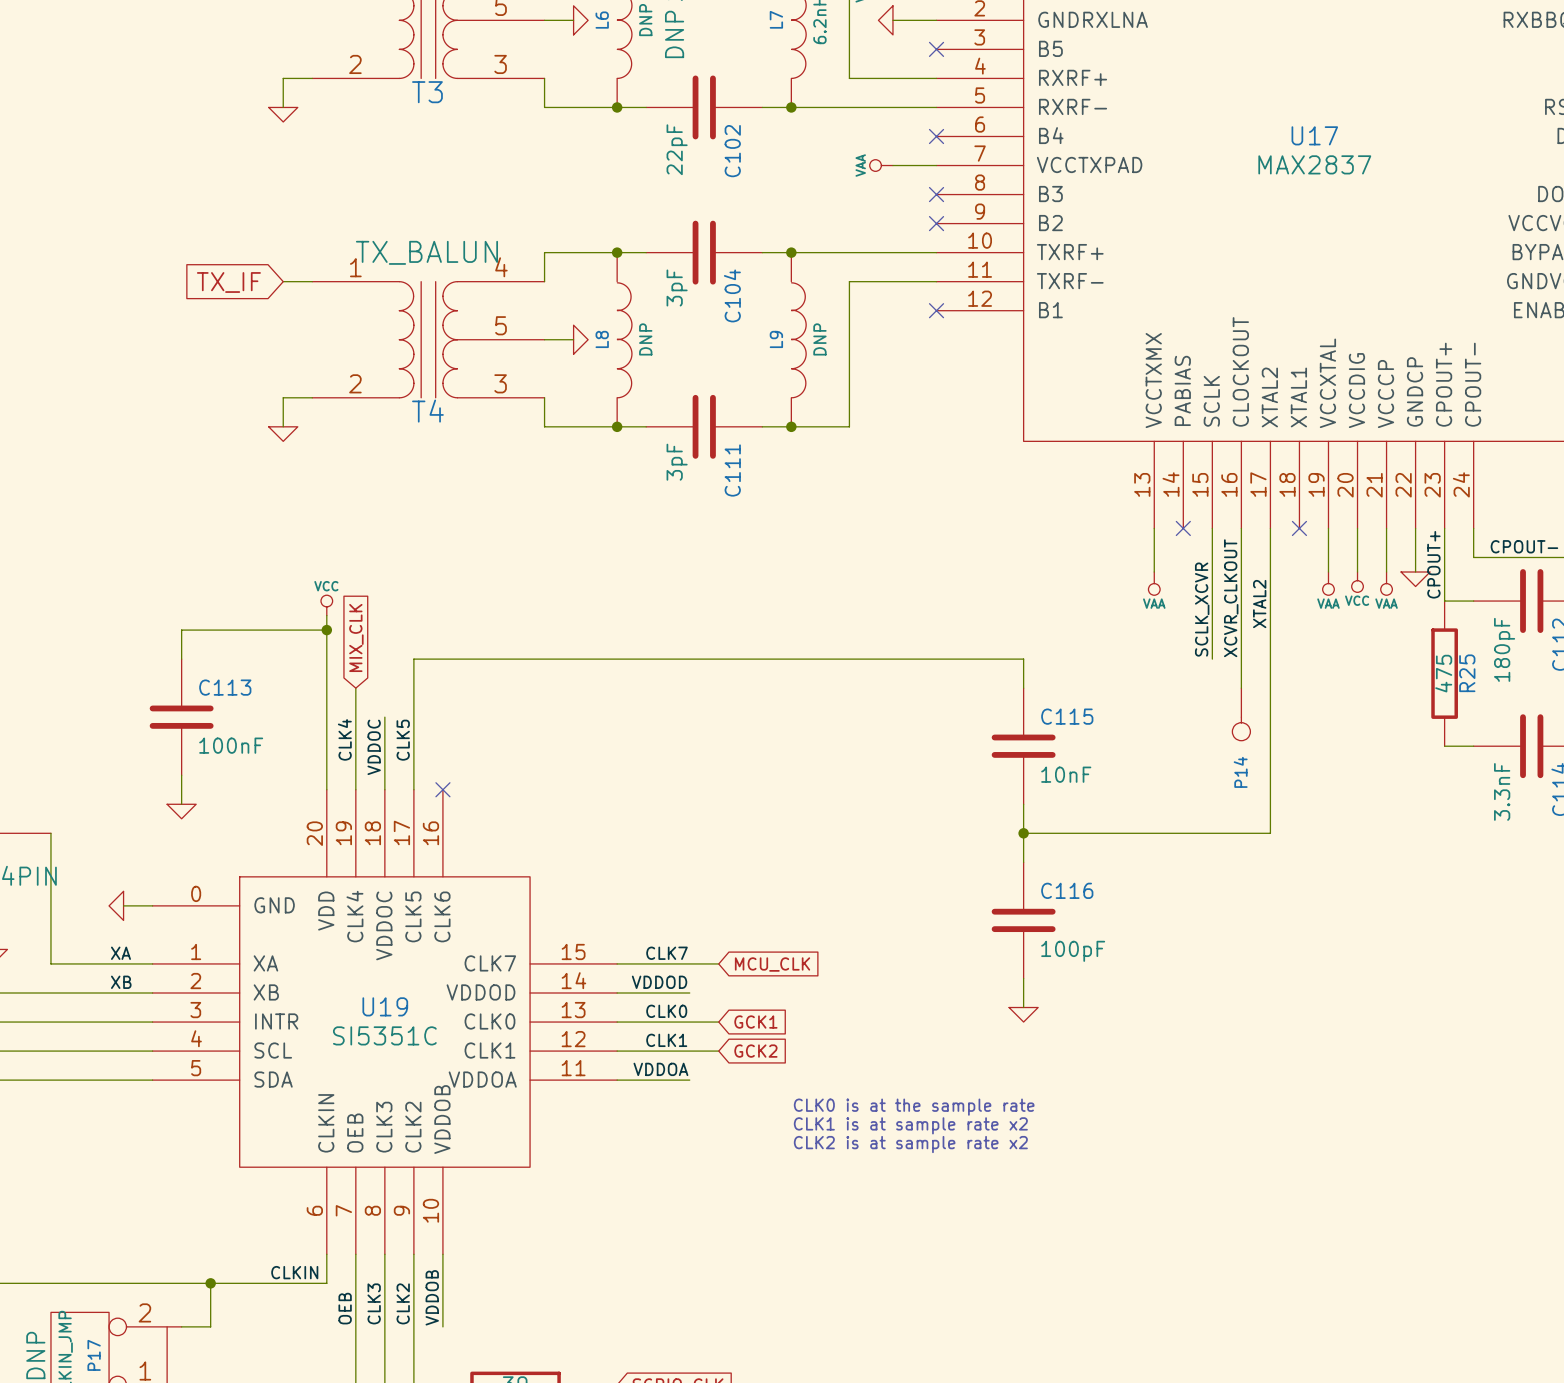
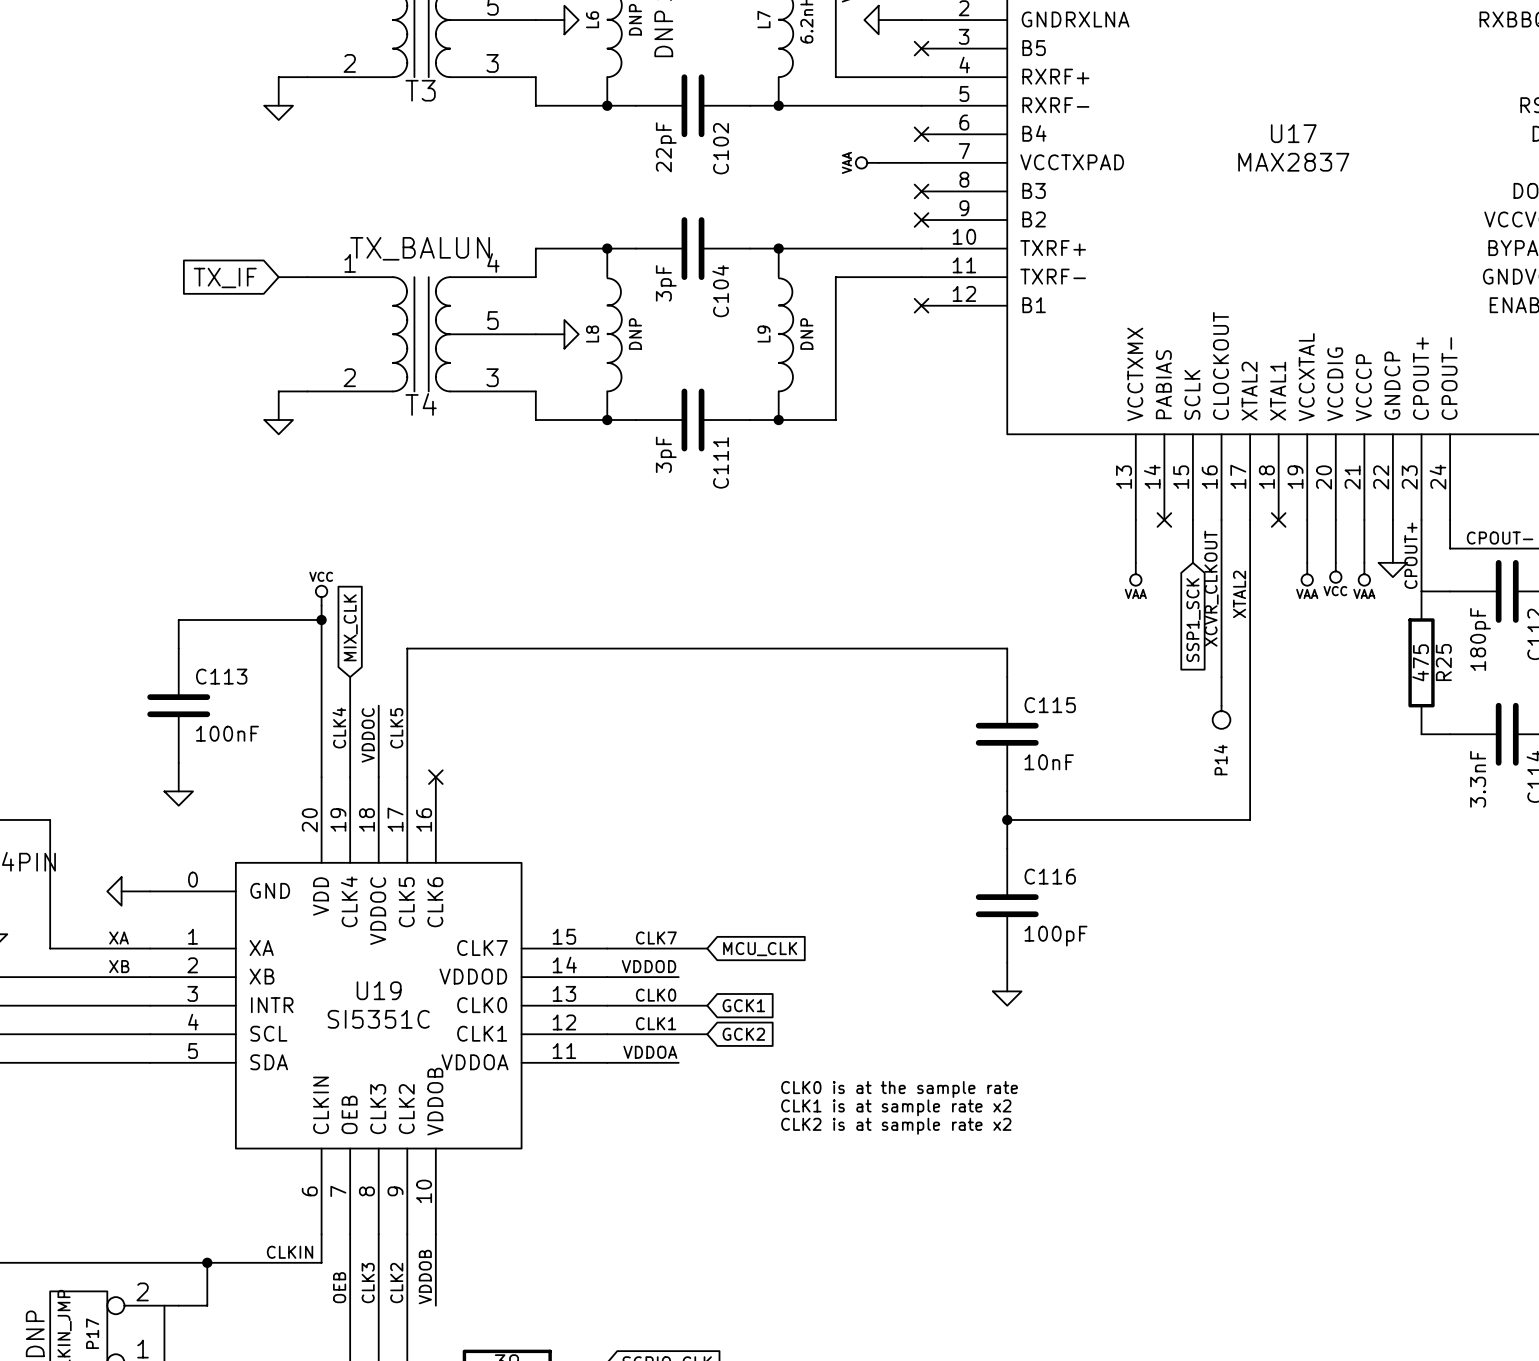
wire: (1212, 572) (1212, 659) -> none
label: SCLK_XCVR (1202, 609) -> none
global label: none -> SSP1_SCK (1193, 620)

